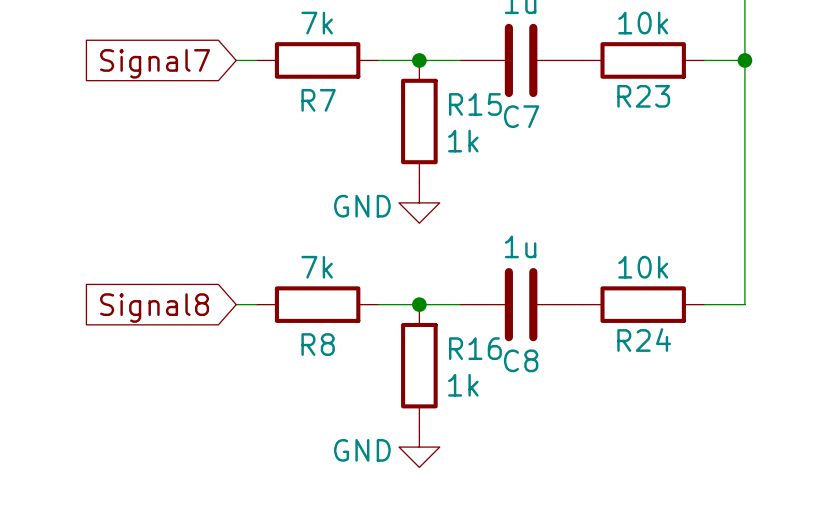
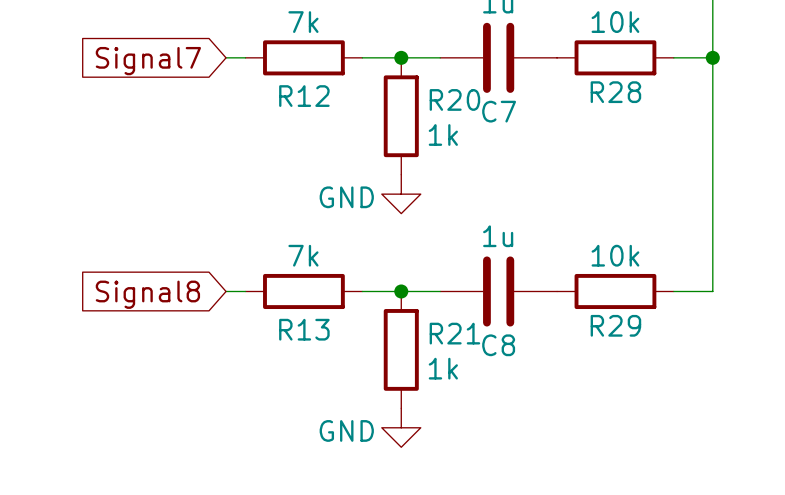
R23 name: R23 (643, 96) -> R28 (615, 92)
R7 name: R7 (318, 100) -> R12 (304, 96)
R15 name: R15 (475, 104) -> R20 (454, 99)
R24 name: R24 (644, 340) -> R29 (615, 325)
R8 name: R8 (318, 344) -> R13 (304, 329)
R16 name: R16 (475, 348) -> R21 (454, 333)

